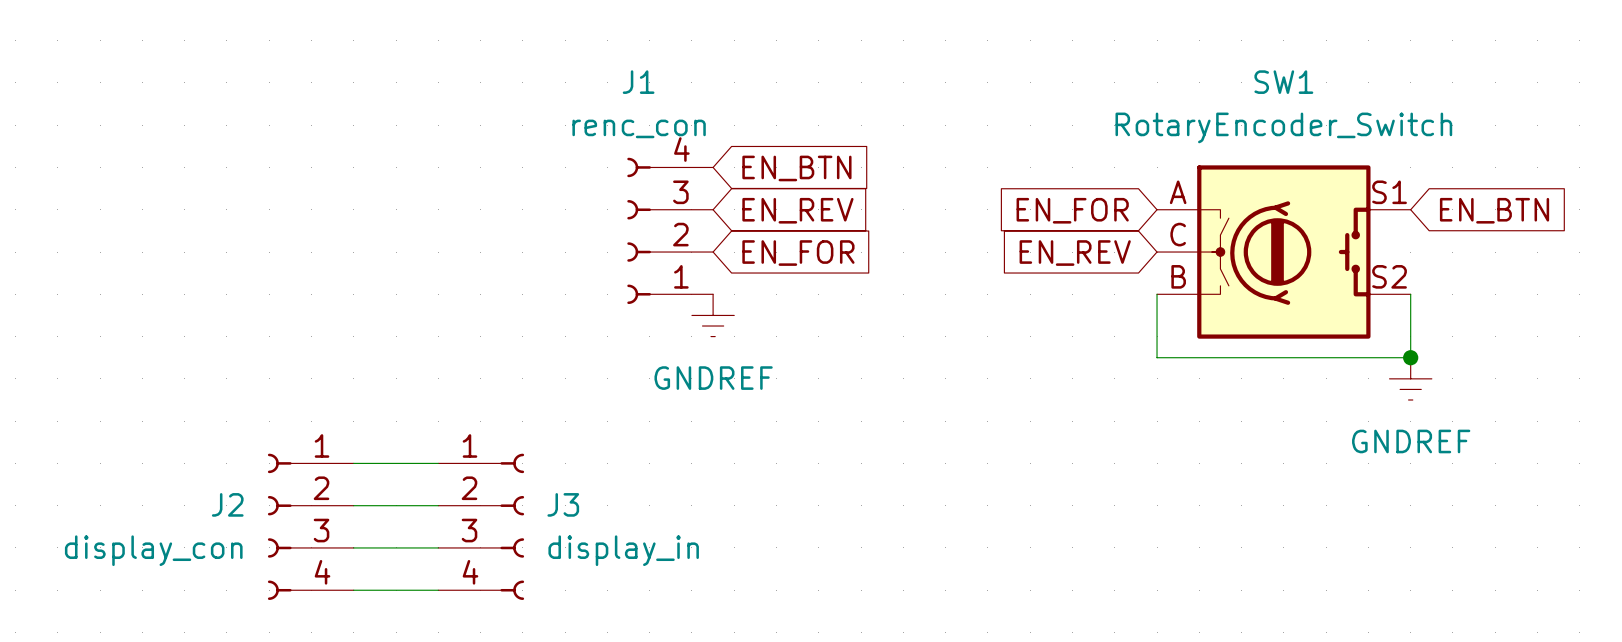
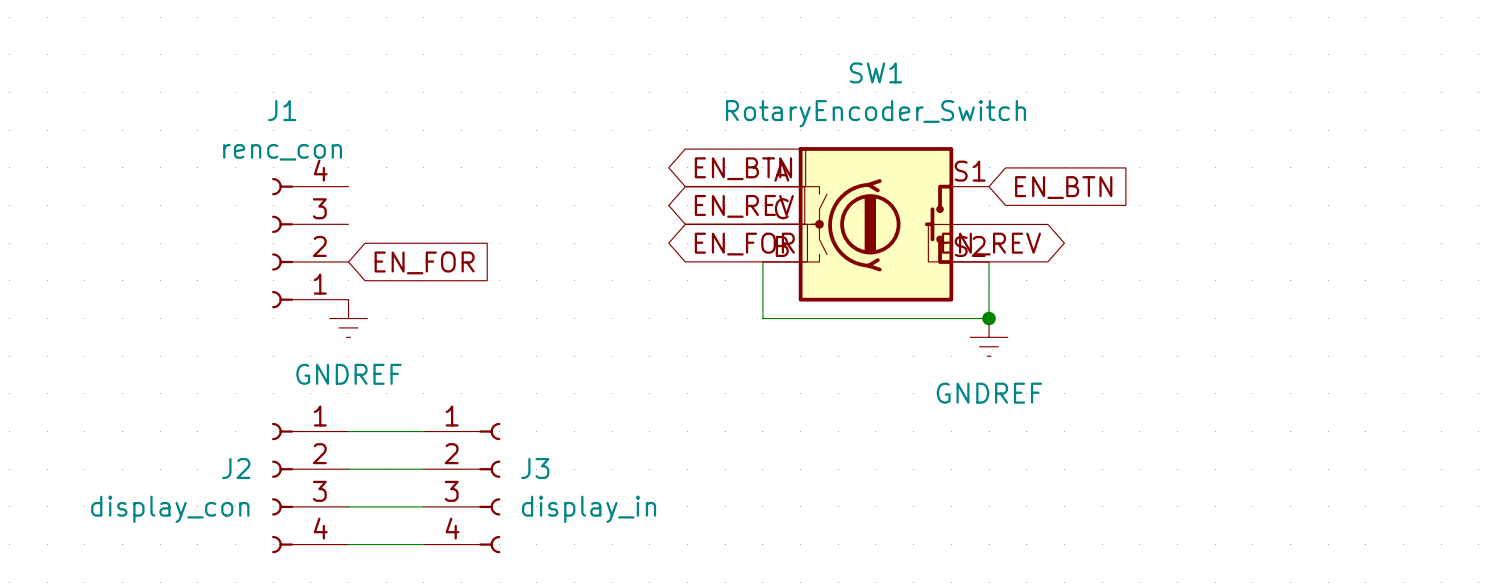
global label: EN_FOR (1072, 210) -> none
global label position: EN_BTN (1494, 210) -> EN_BTN (1063, 187)
J1 position: (670, 230) -> (310, 243)
SW1 position: (1283, 252) -> (875, 224)
global label: none -> EN_FOR (424, 262)
wire: (1157, 294) (1157, 357) (1410, 357) (1410, 294) -> (762, 262) (762, 318) (989, 318) (989, 262)
power symbol: GNDREF (713, 315) -> none
power symbol: none -> GNDREF (348, 318)
junction: none -> (989, 318)
power symbol: none -> GNDREF (989, 337)
junction: (1410, 357) -> none
power symbol: GNDREF (1410, 378) -> none

